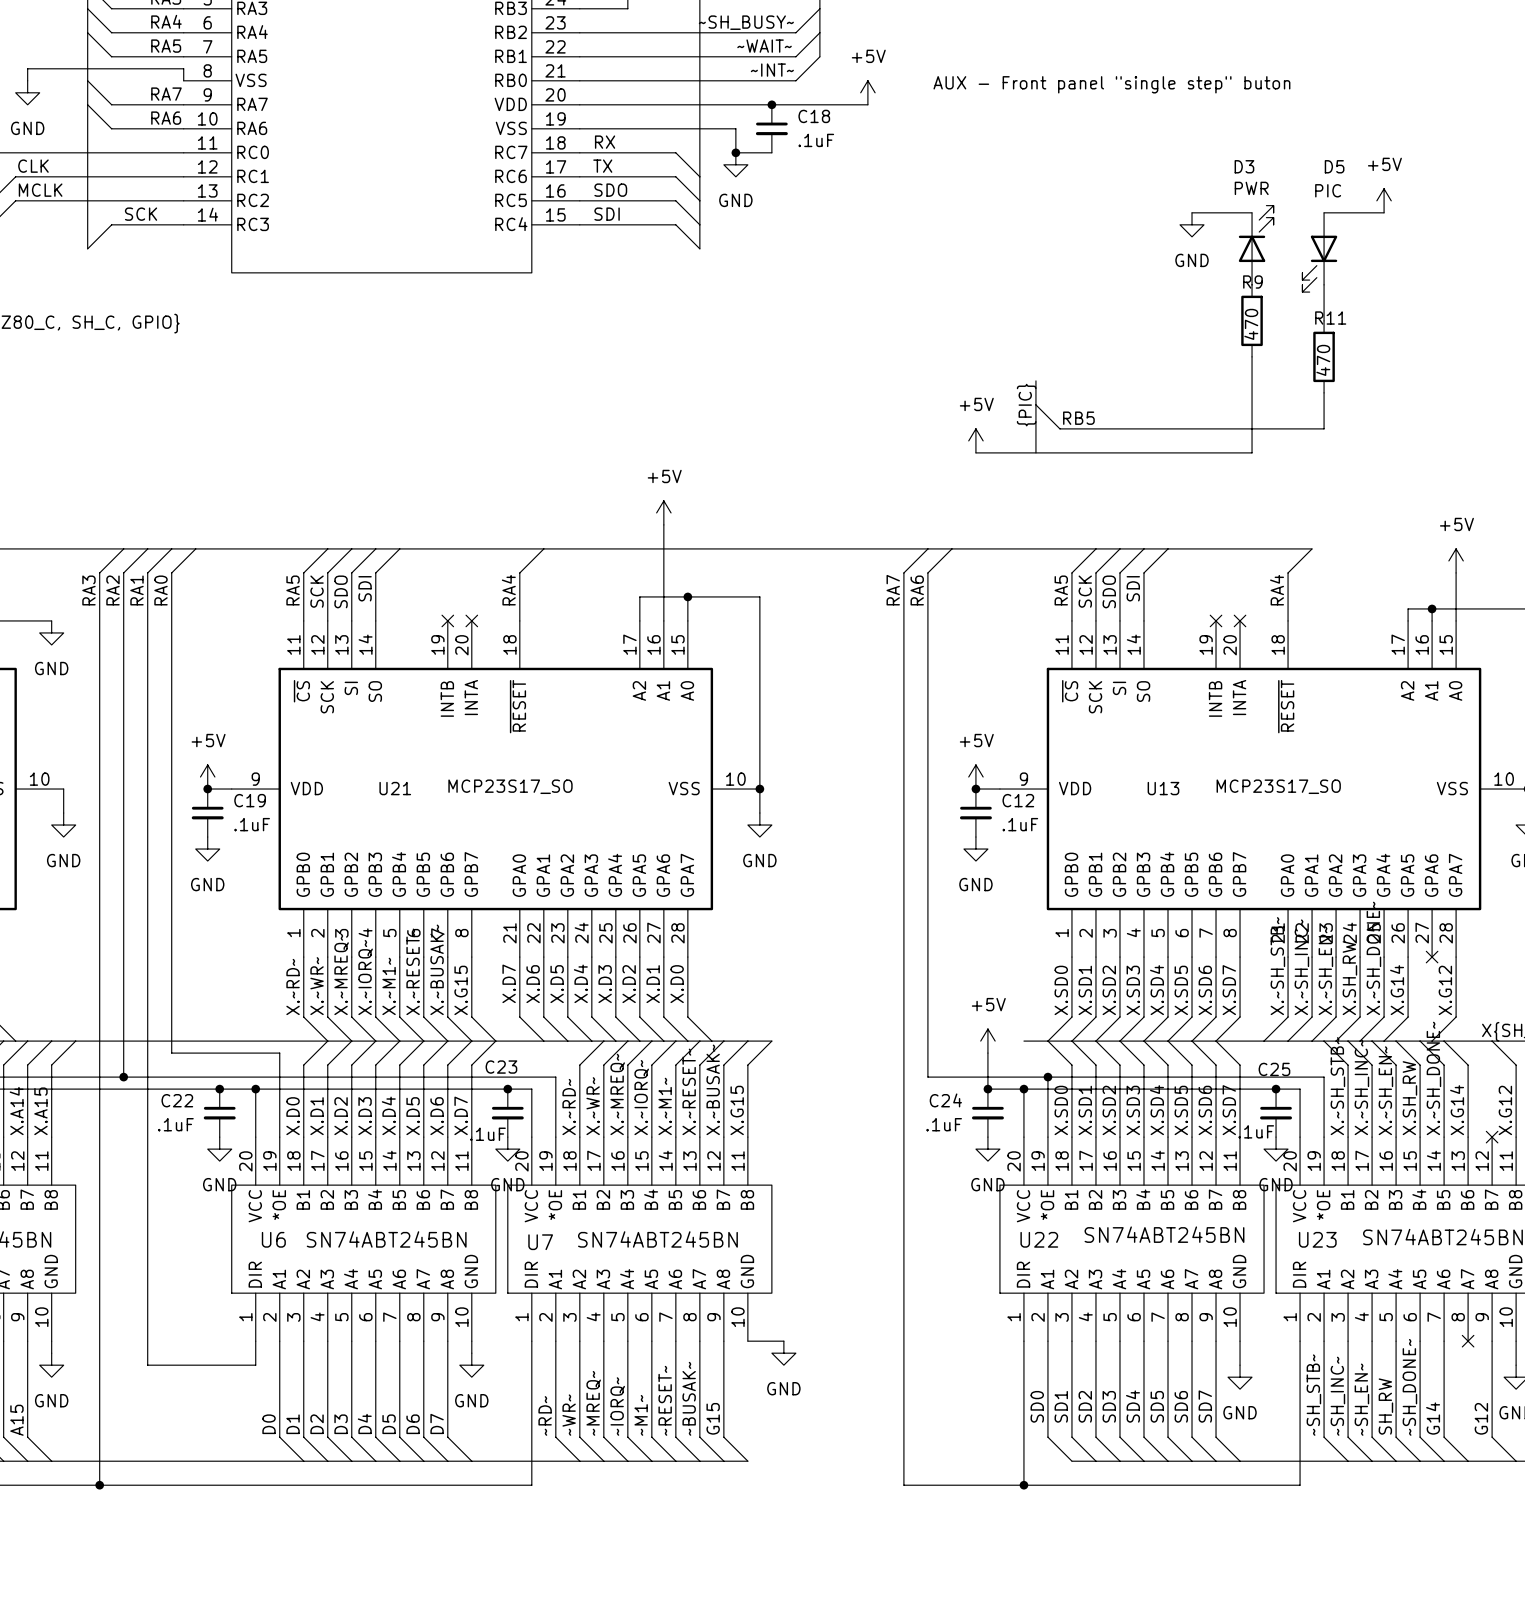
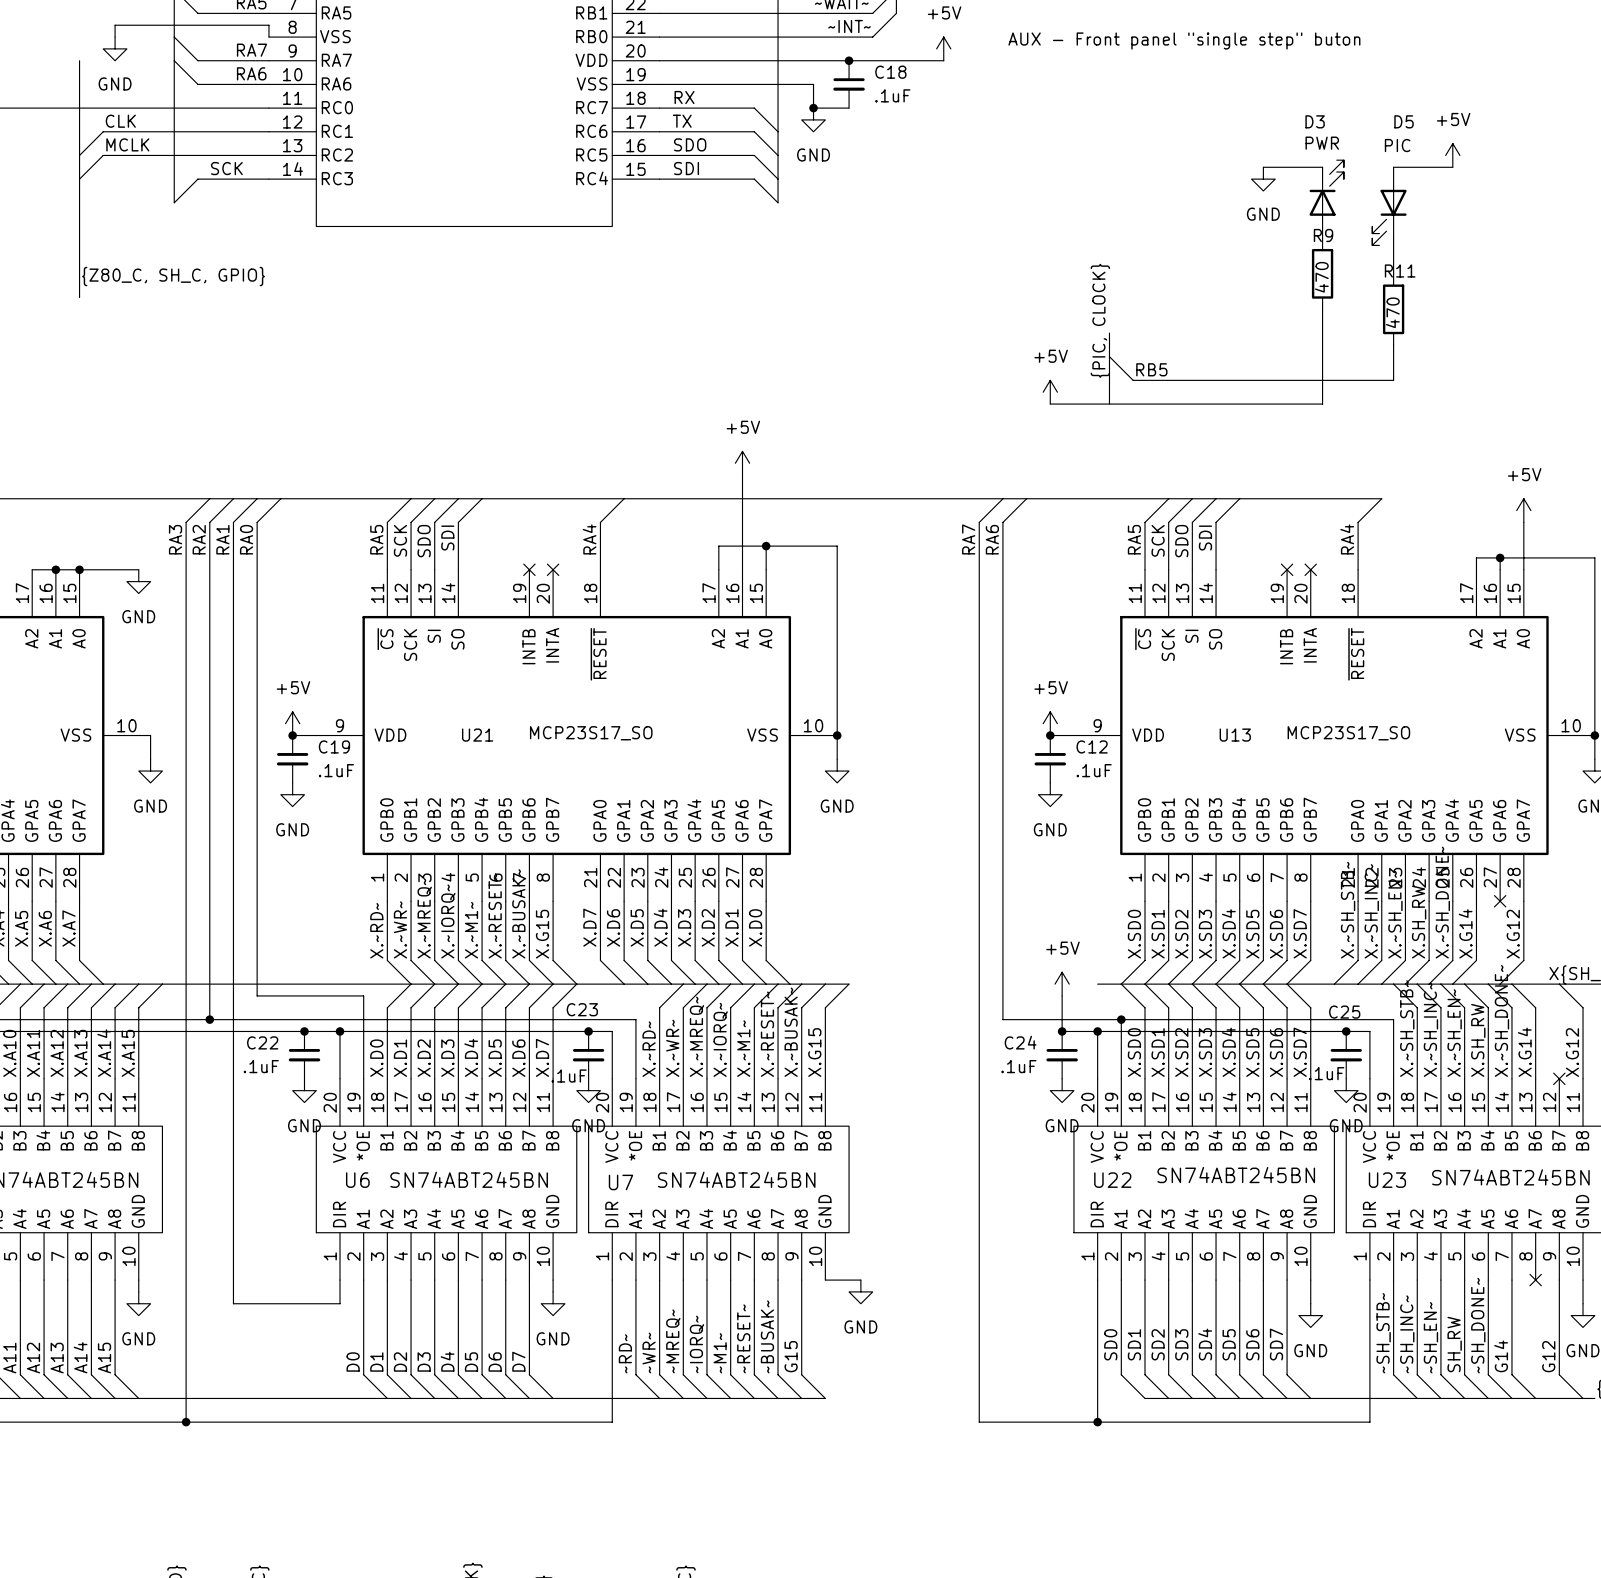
label: {PIC} (1026, 405) -> {PIC, CLOCK} (1100, 320)

